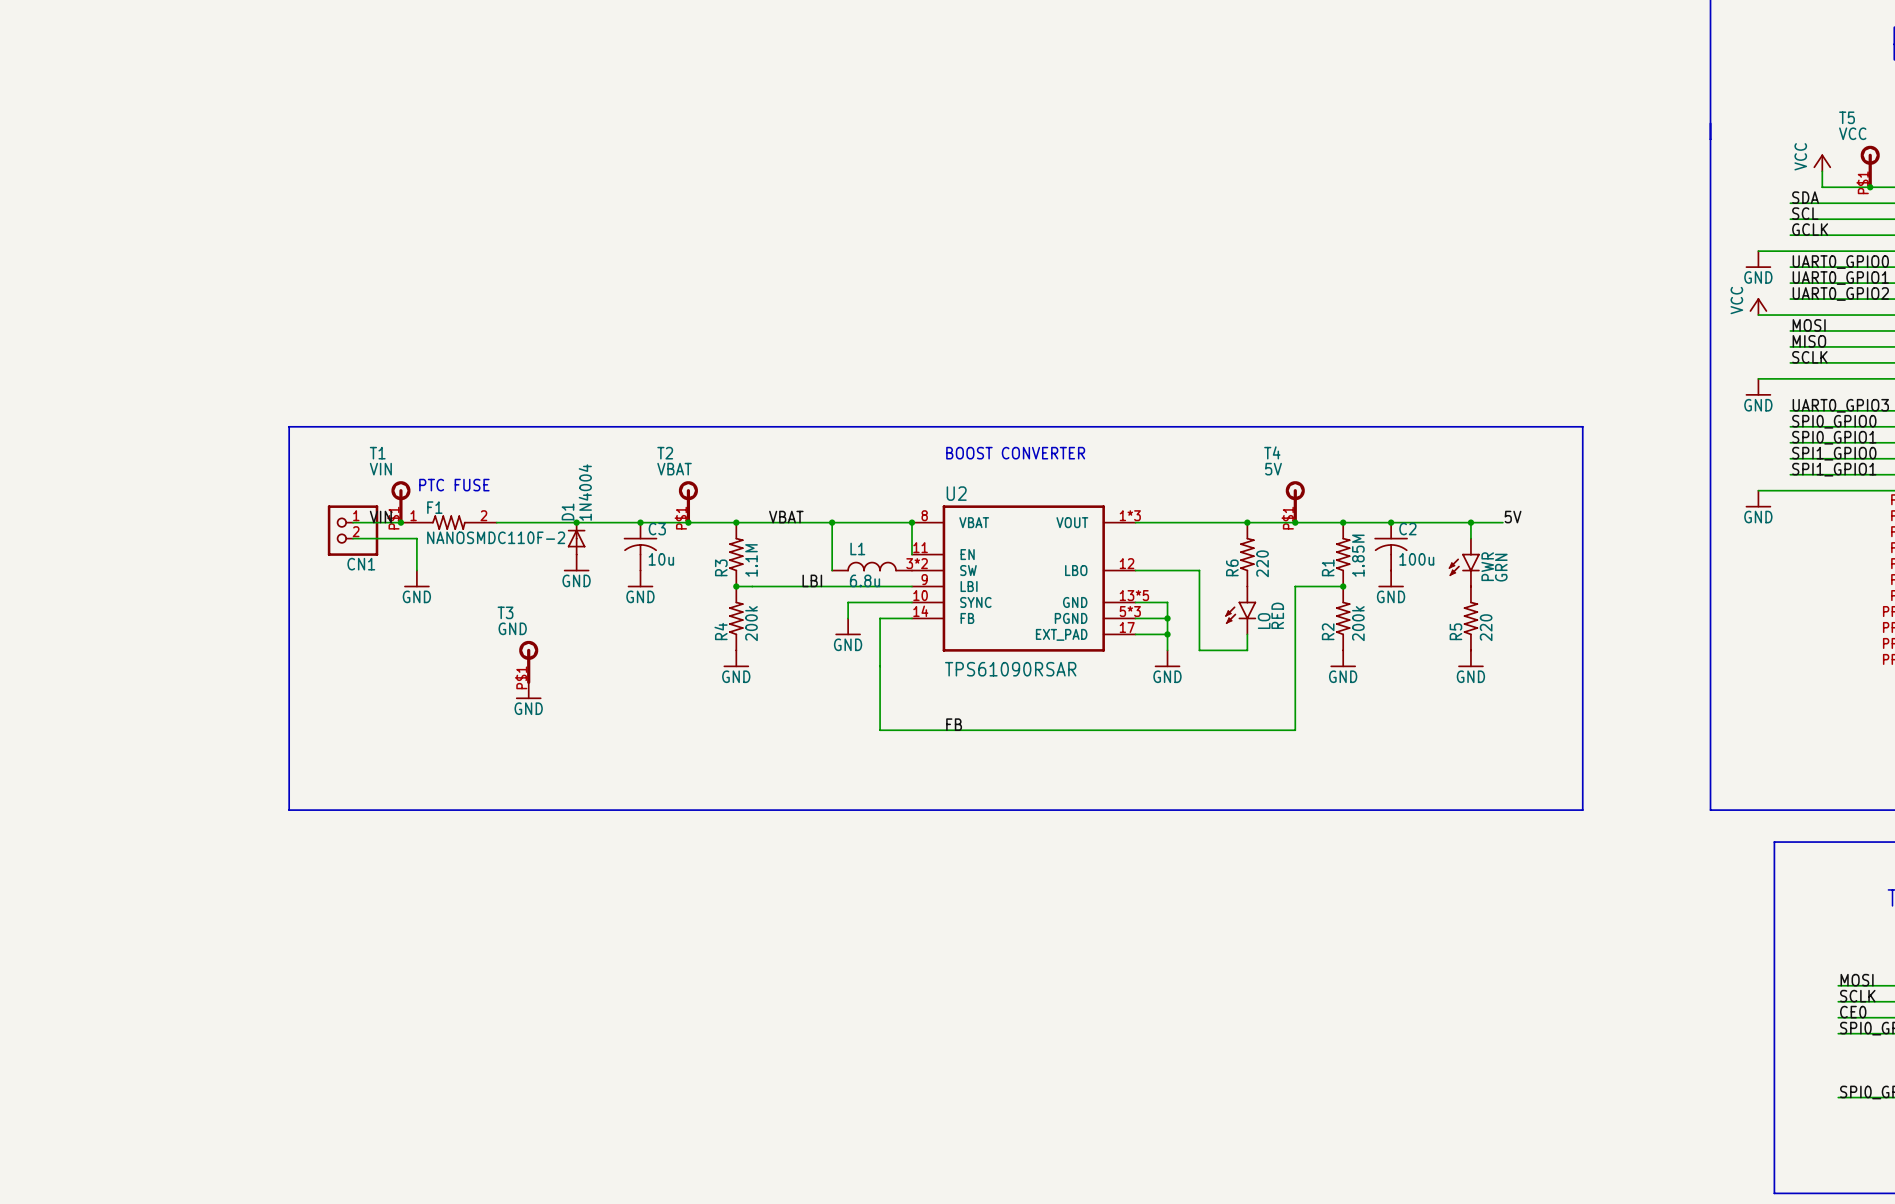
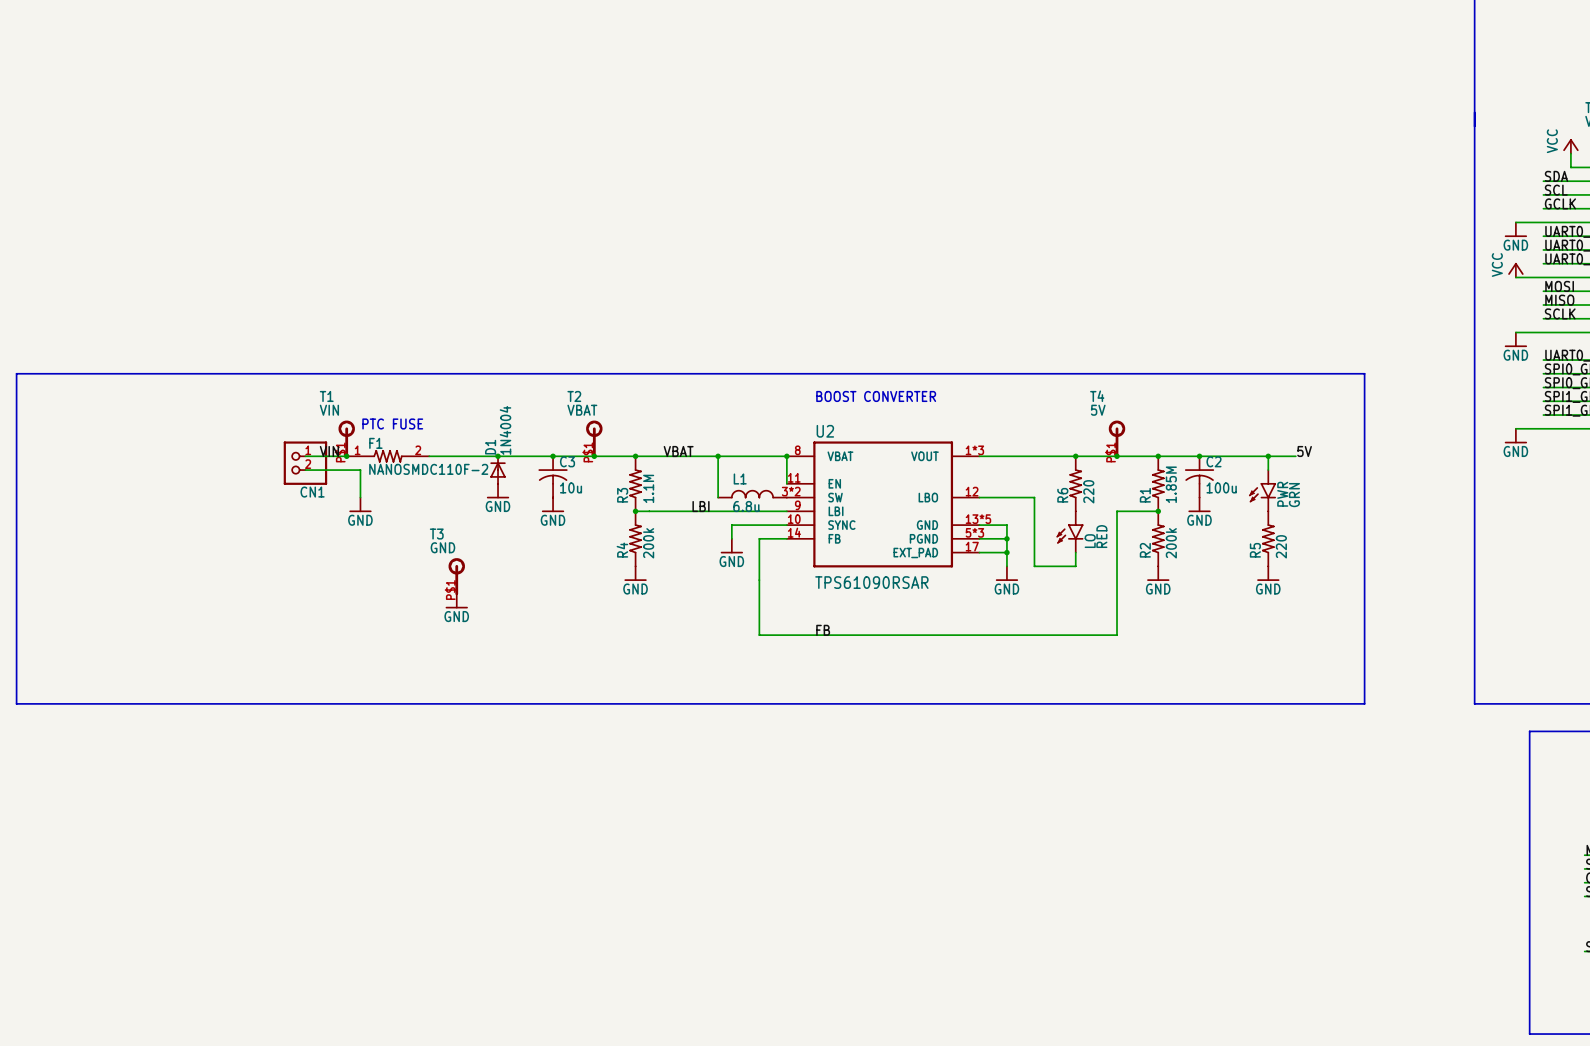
line: (289, 426) (289, 810) -> (250, 373) (16, 373) (16, 703) (250, 703)

